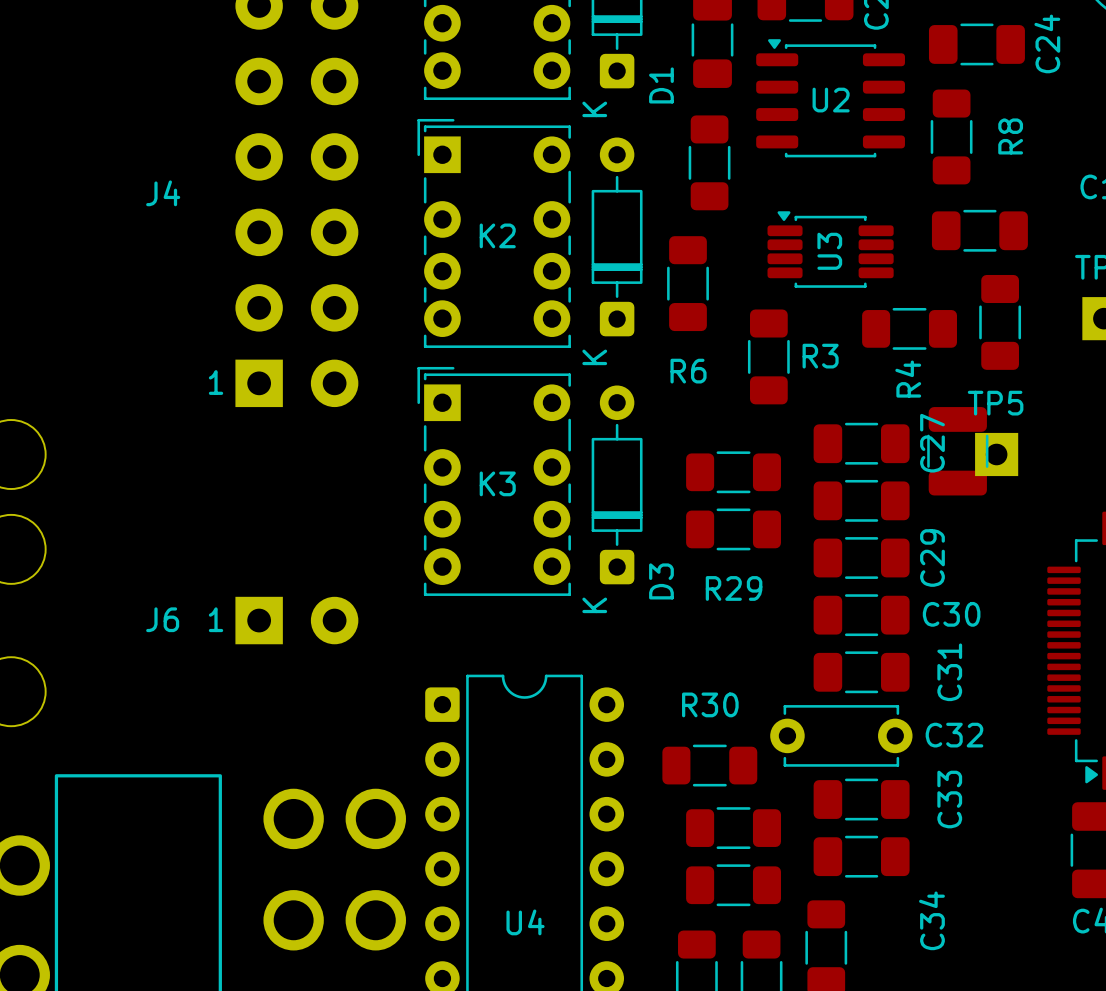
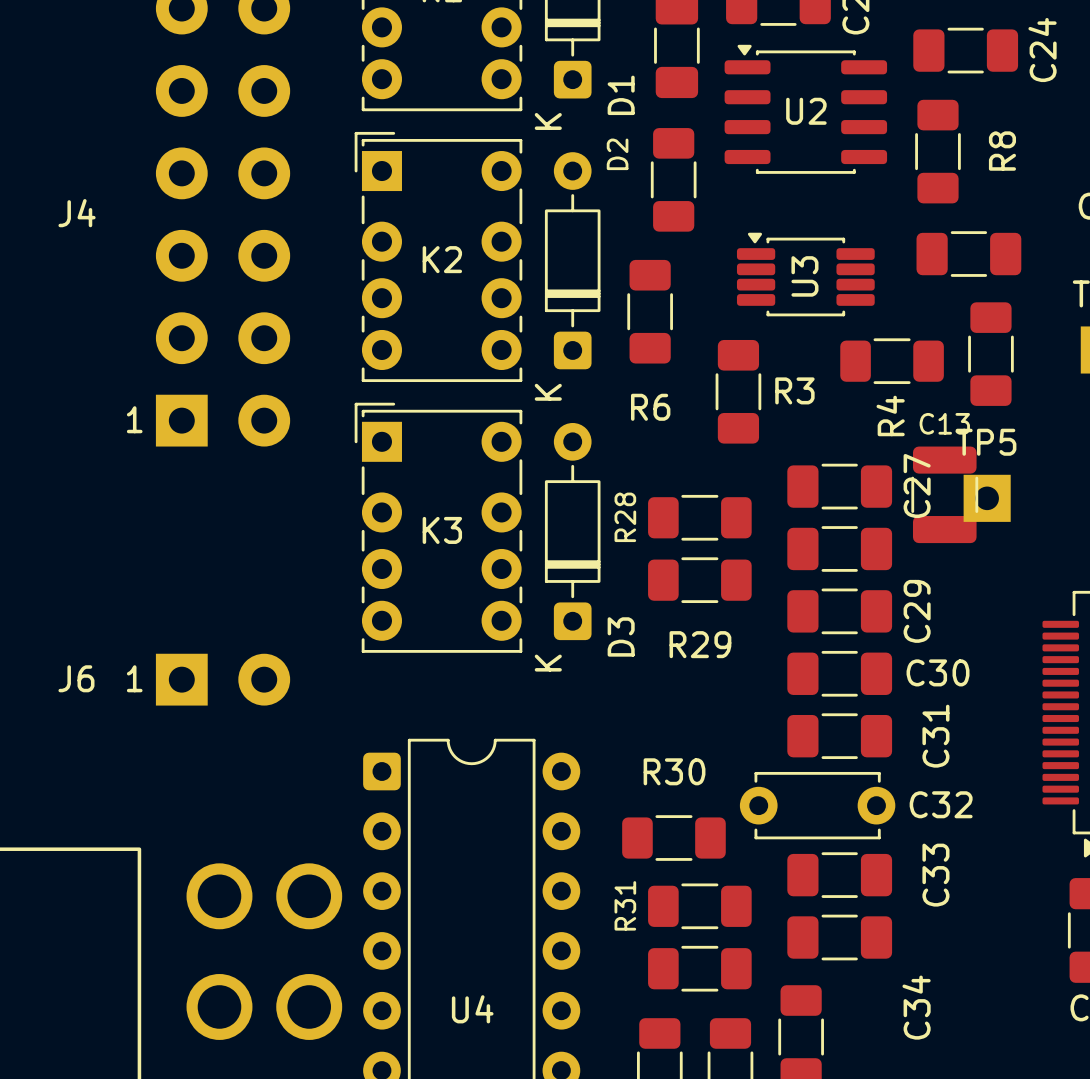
D2 name: none -> D2 (617, 154)
C13 name: none -> C13 (944, 423)
R28 name: none -> R28 (625, 517)
R31 name: none -> R31 (625, 905)

